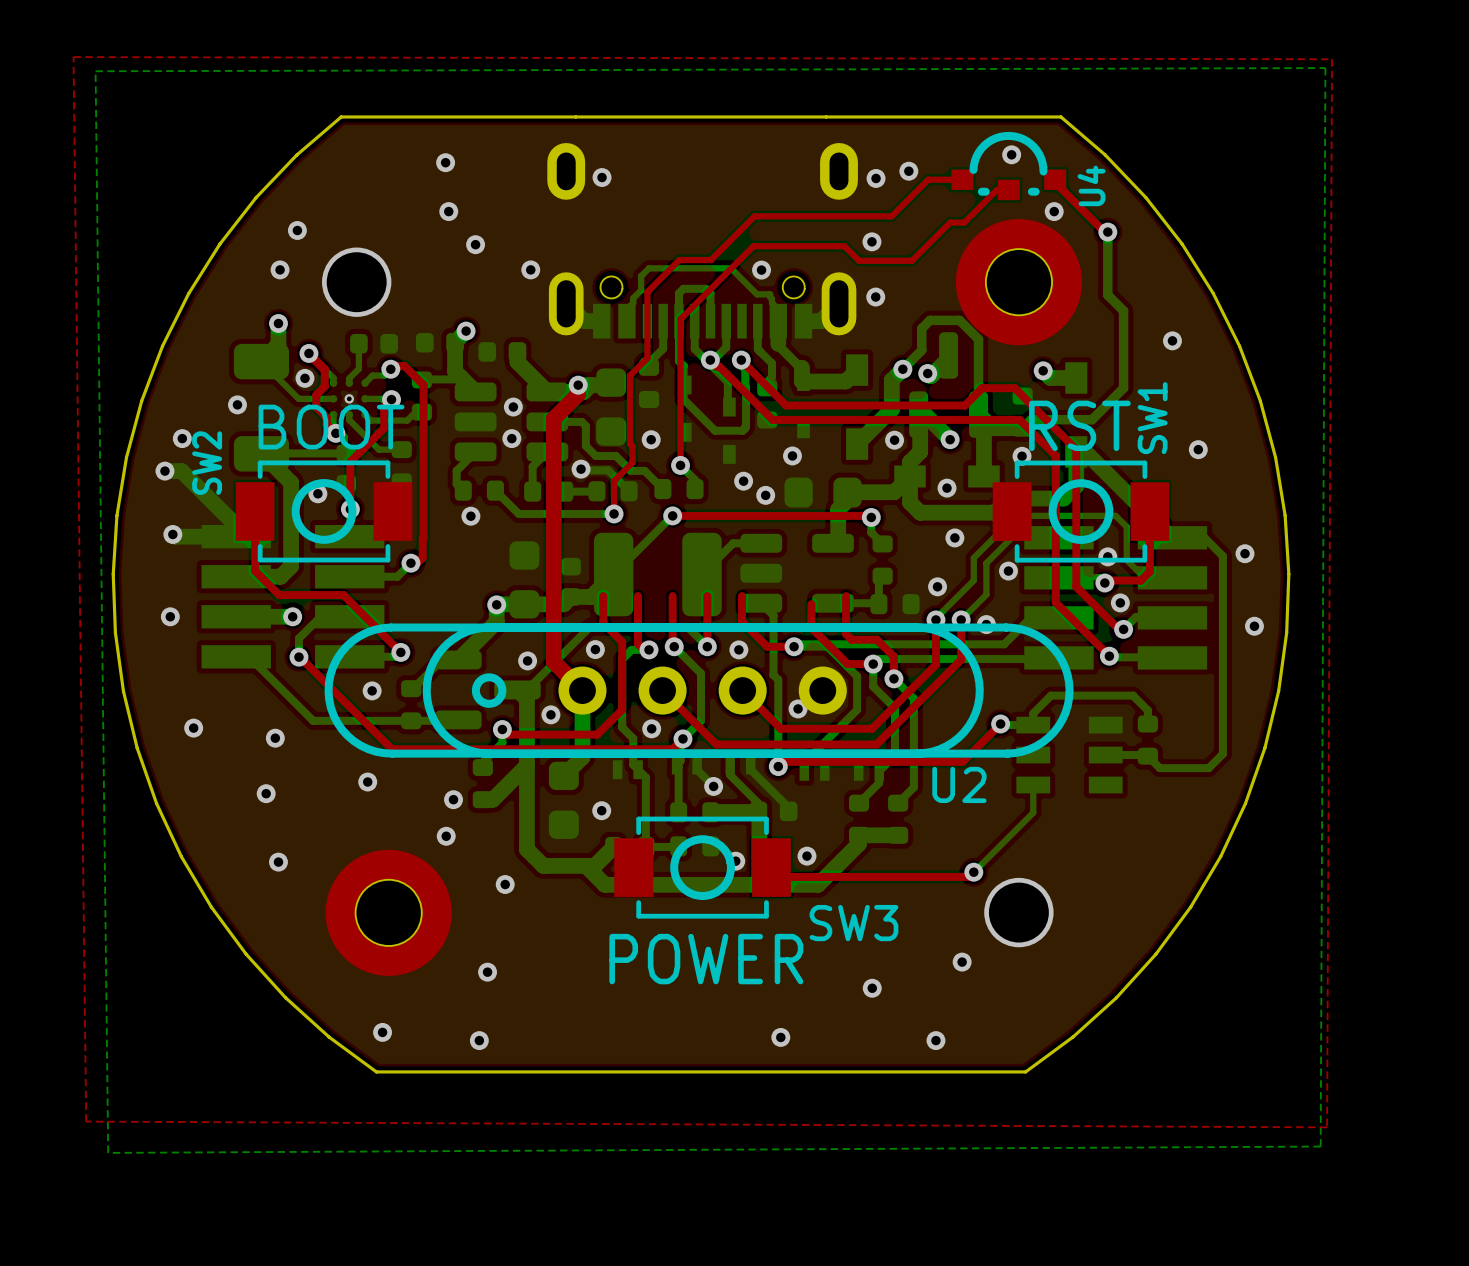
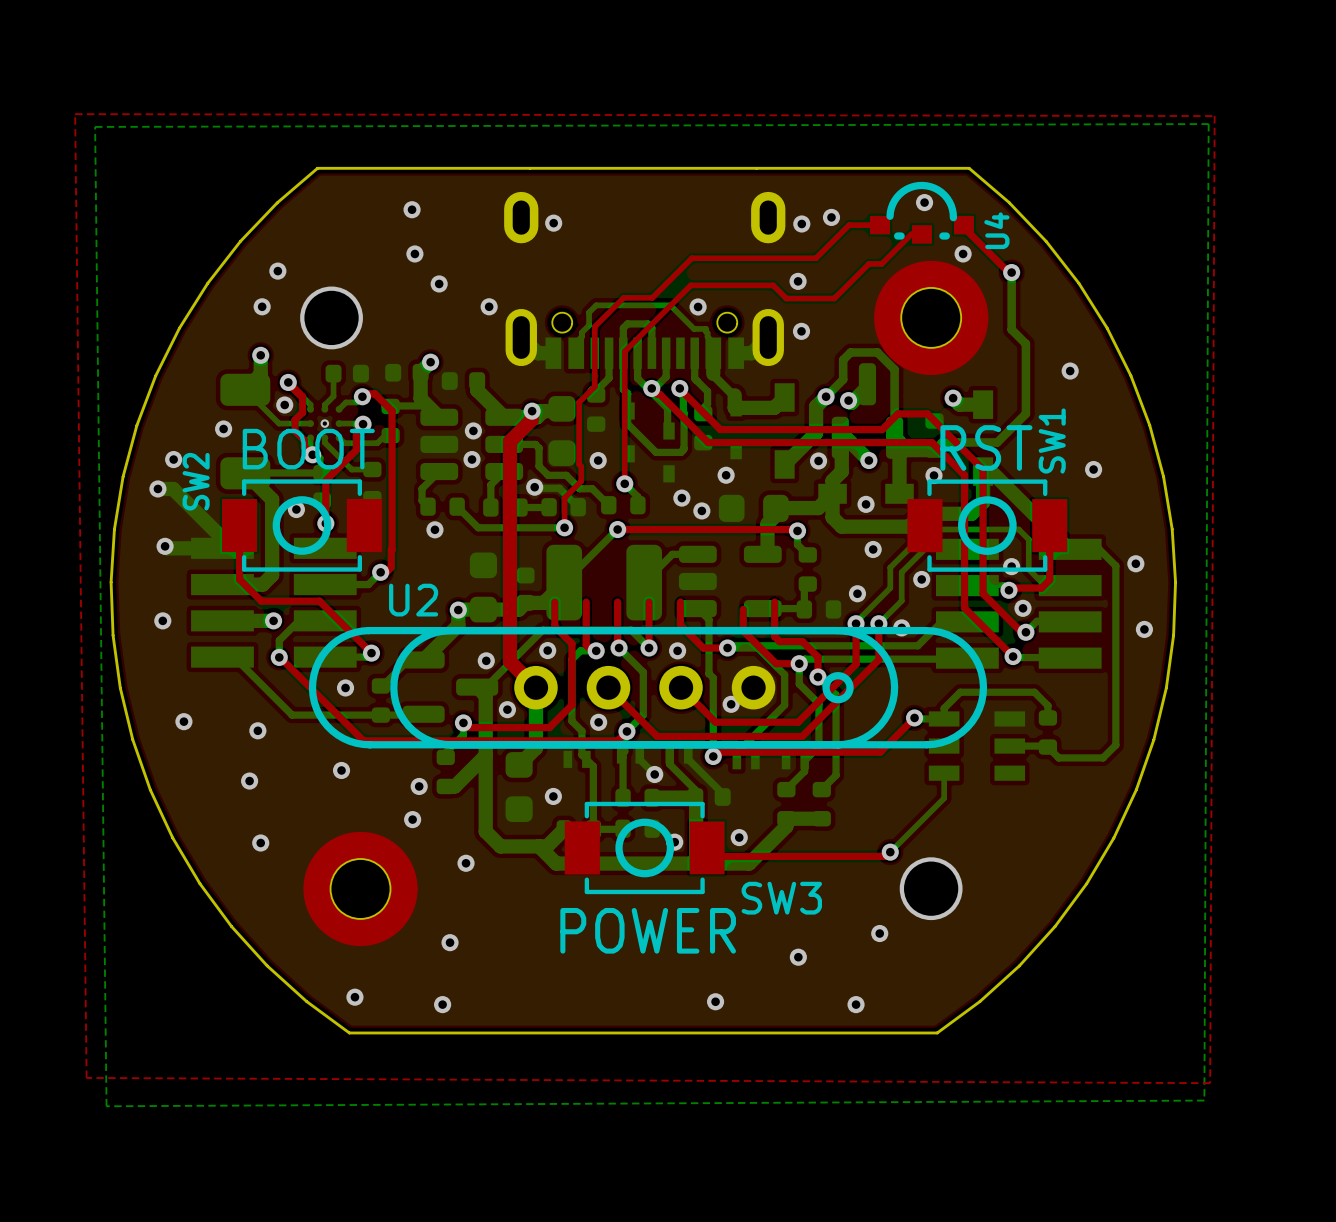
U2 rotation: 0° (699, 690) -> 180° (647, 687)

